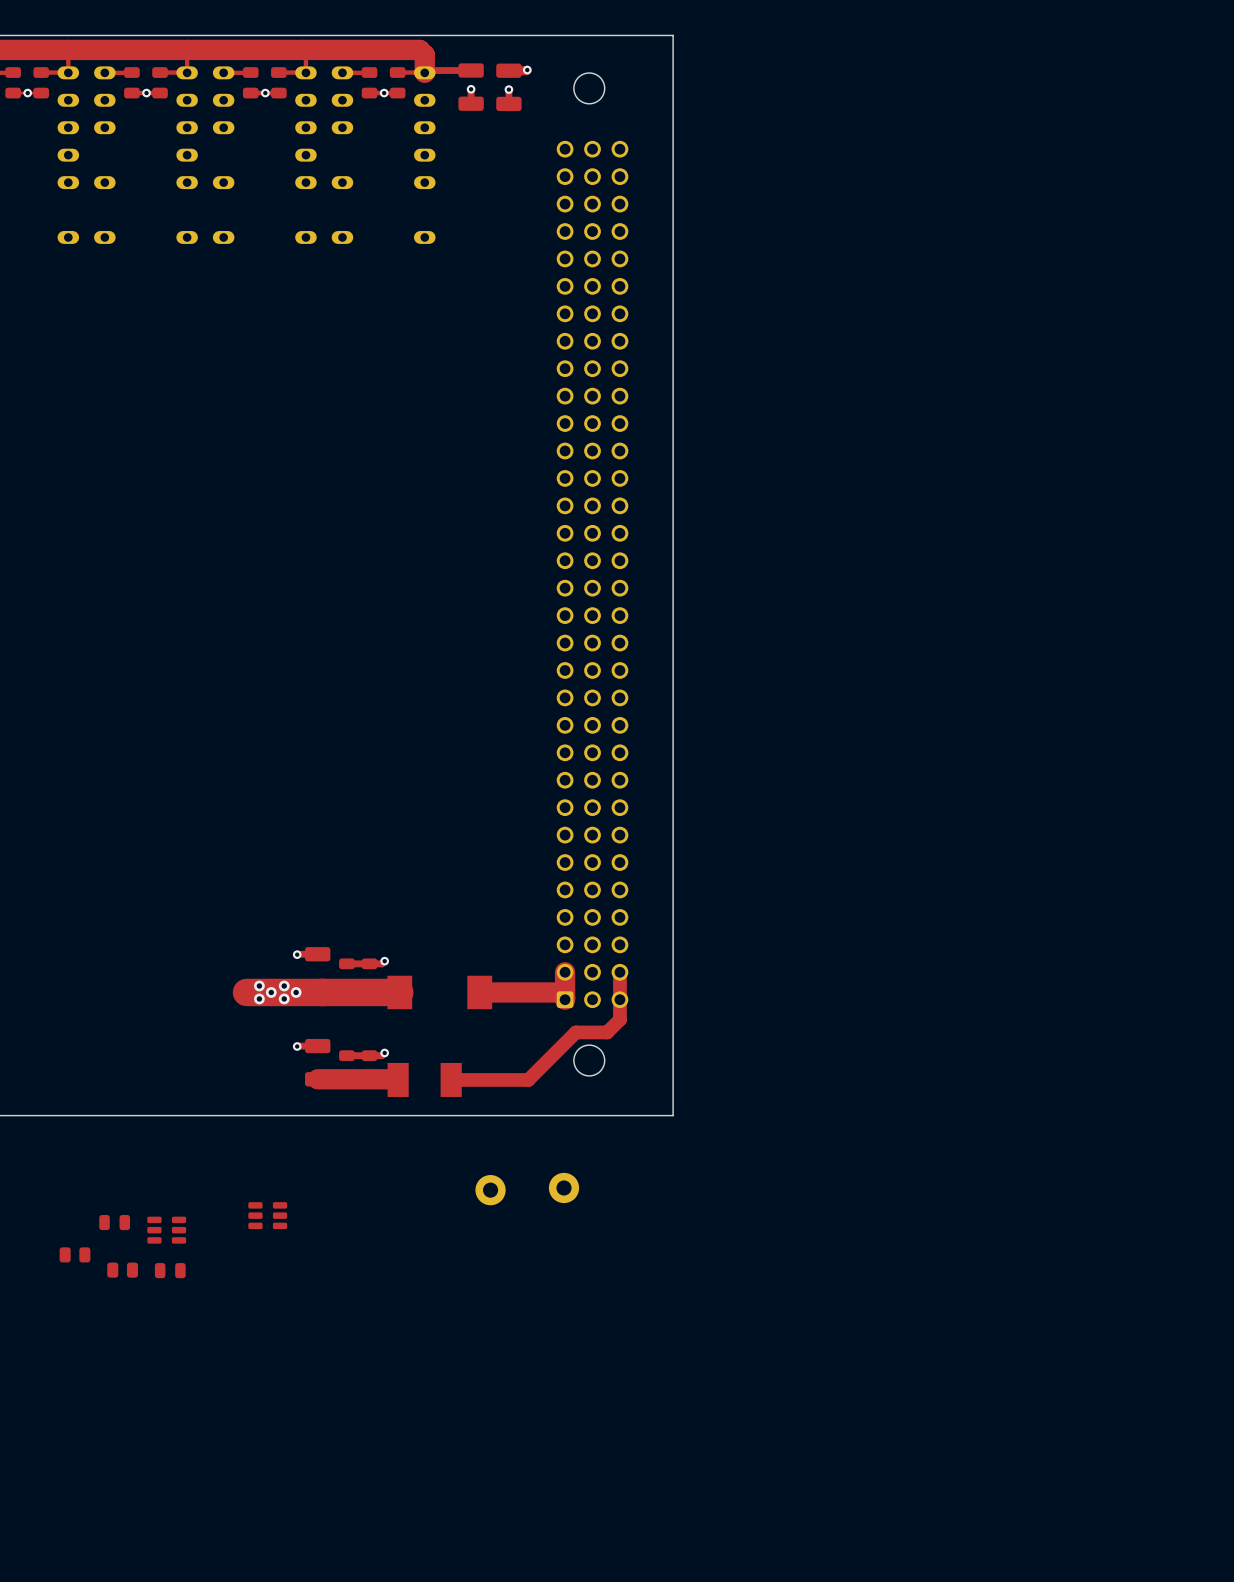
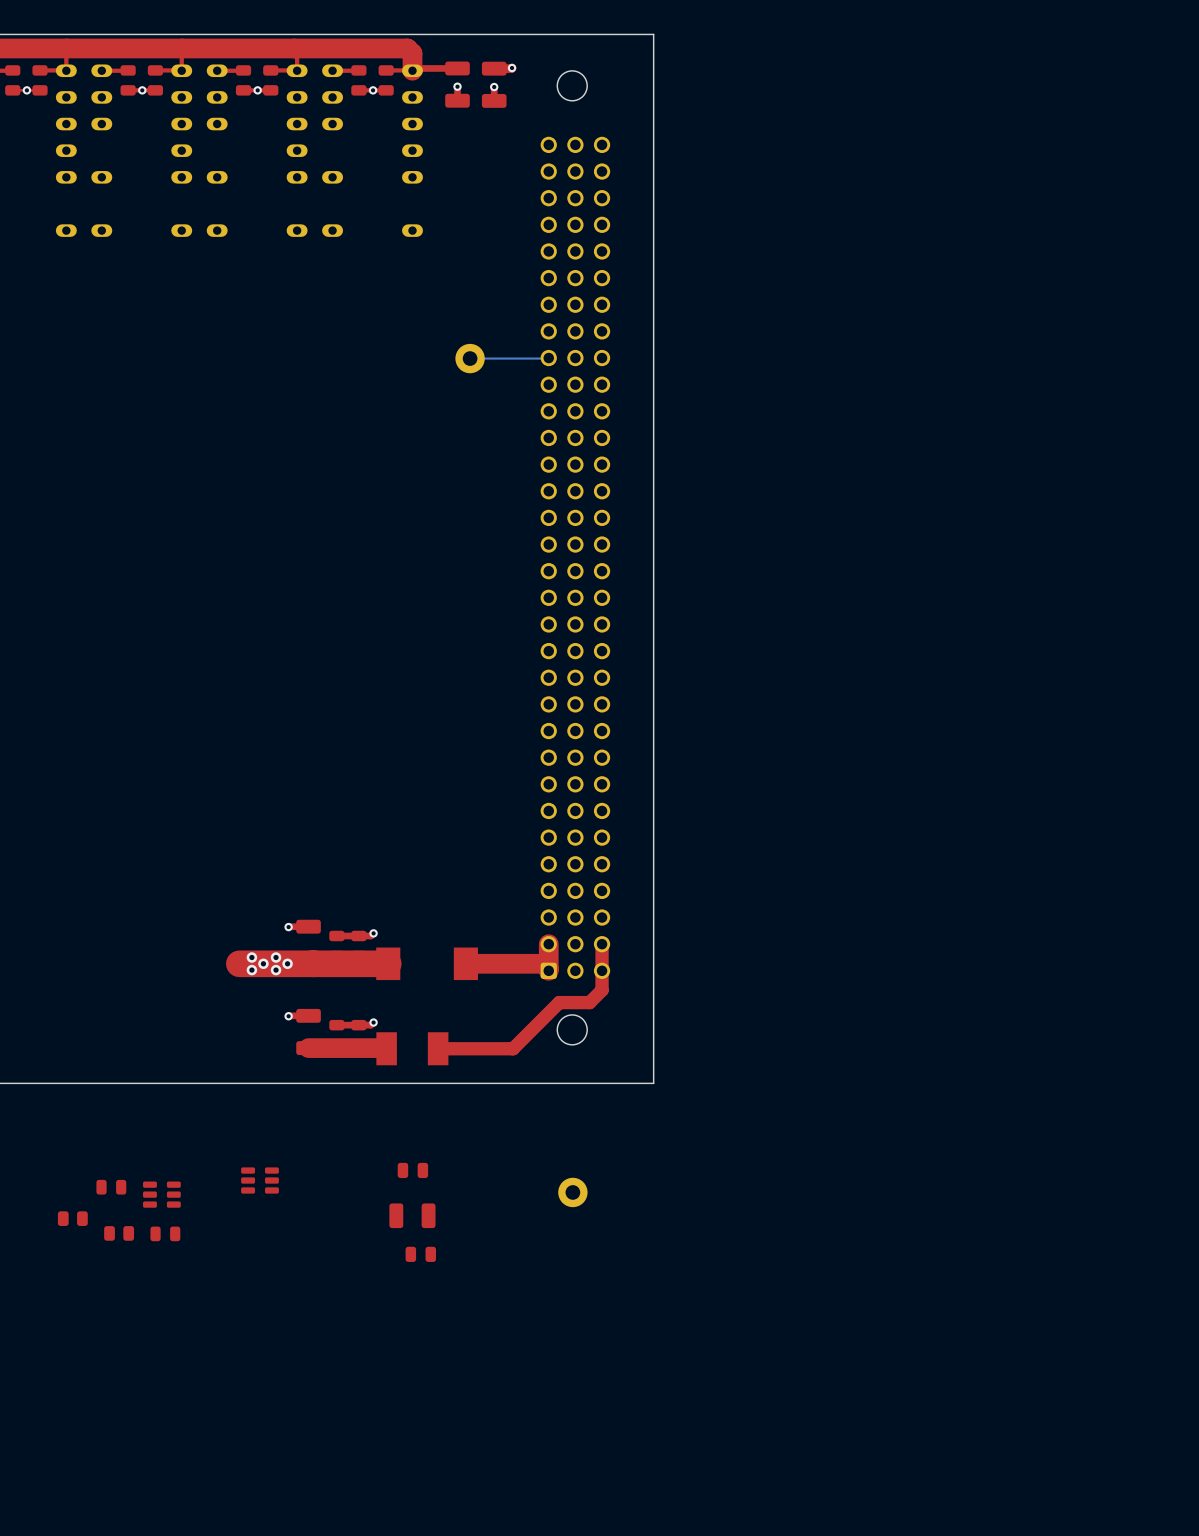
bottom track: none -> (548, 358) (470, 358)
part: none -> (470, 358)
part position: (564, 1187) -> (572, 1192)
part: (490, 1190) -> none
part: none -> (412, 1170)
part: none -> (412, 1215)
part: none -> (420, 1254)

